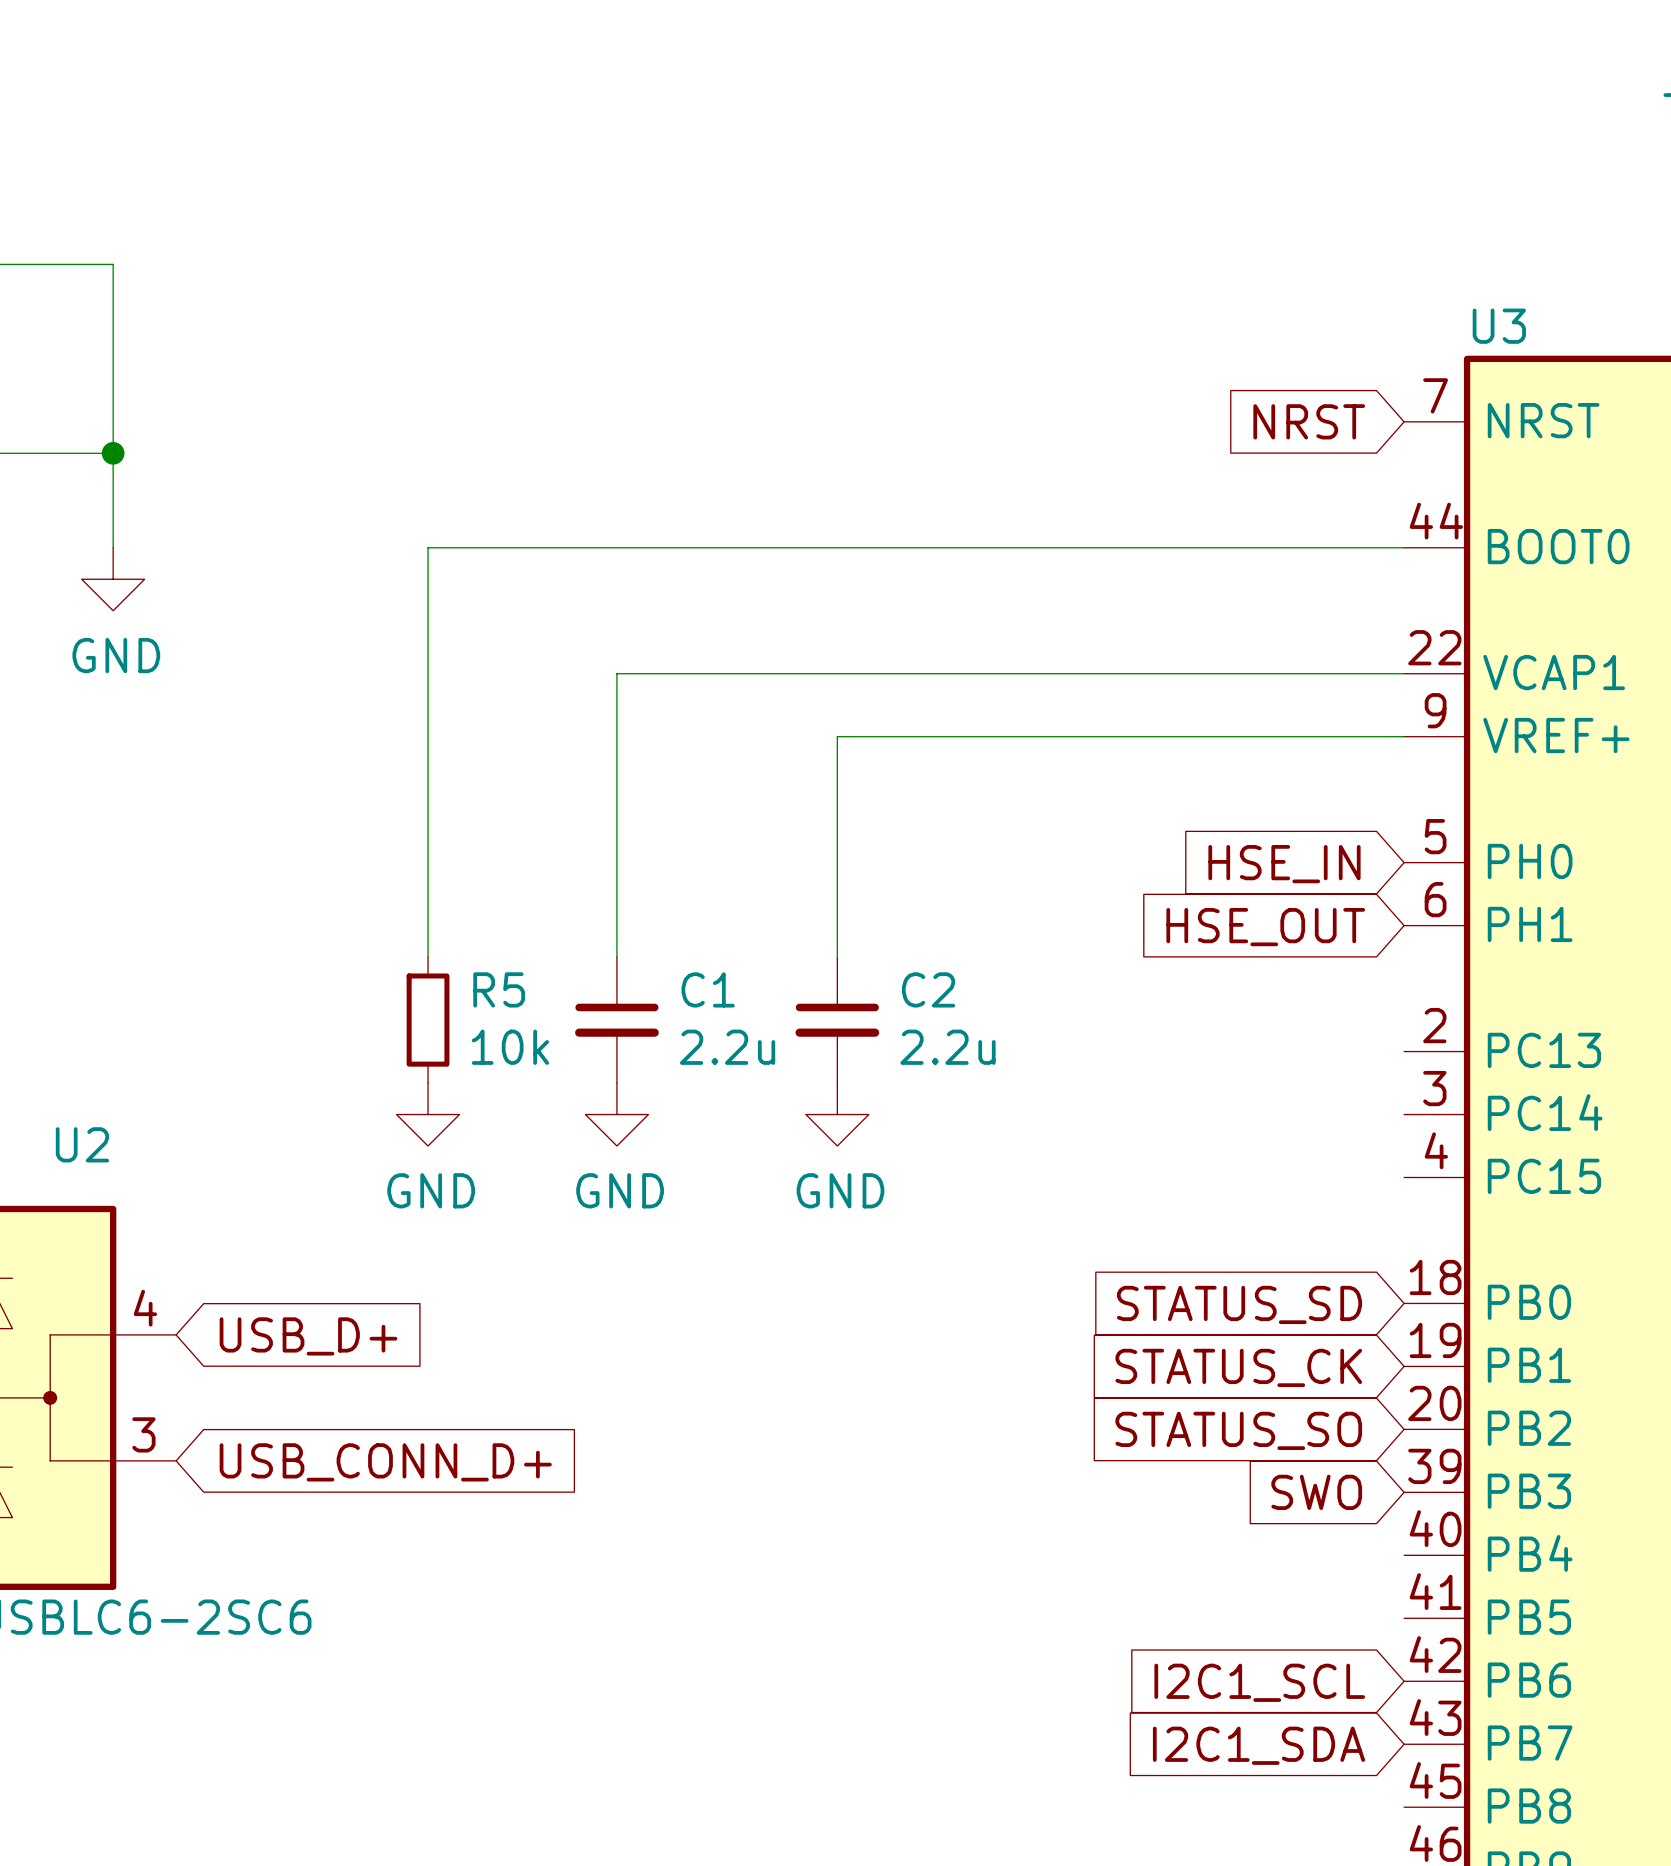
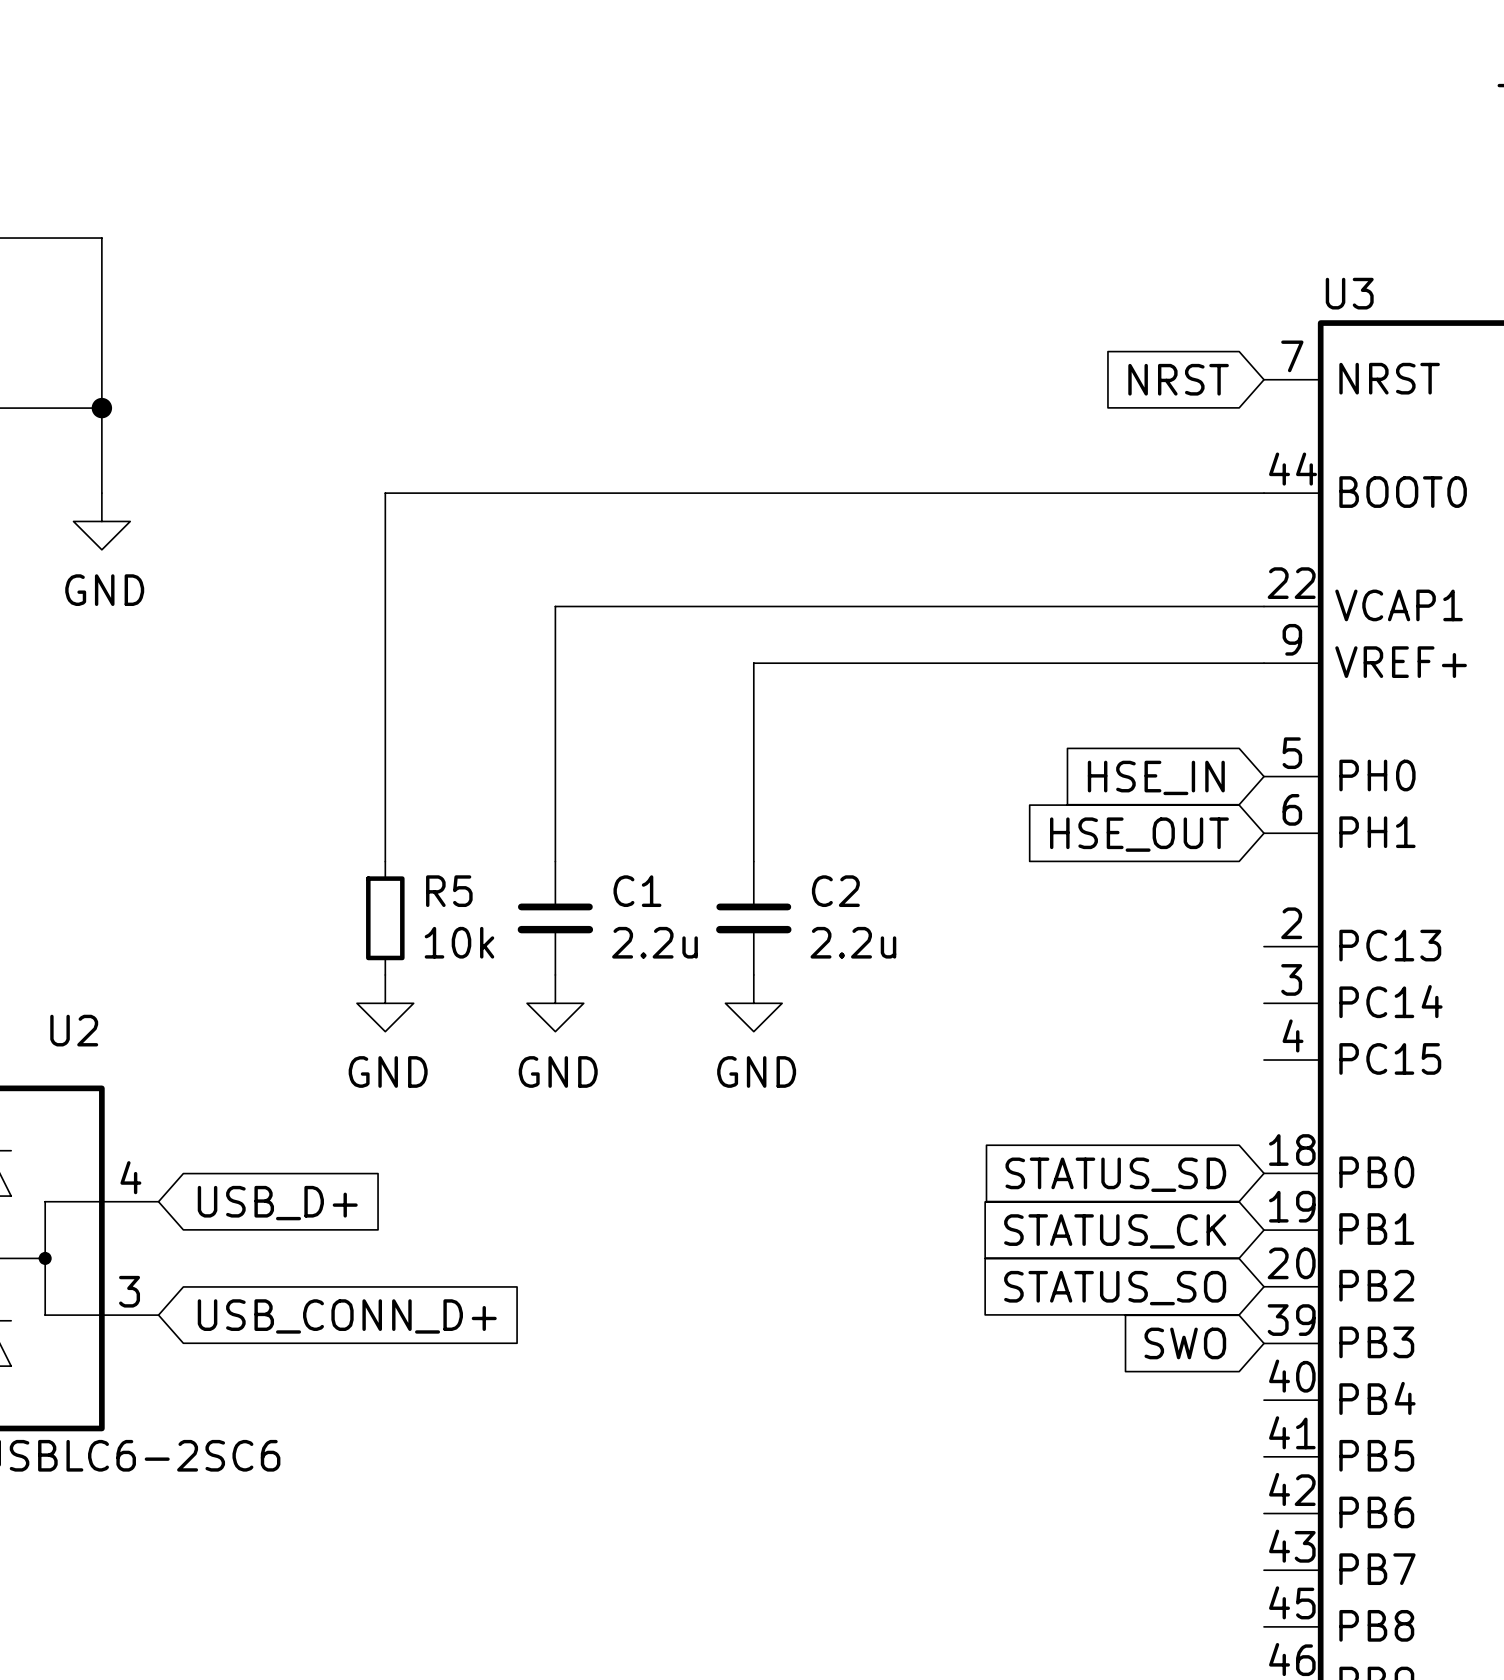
global label: I2C1_SCL (1259, 1682) -> none
global label: I2C1_SDA (1258, 1745) -> none

